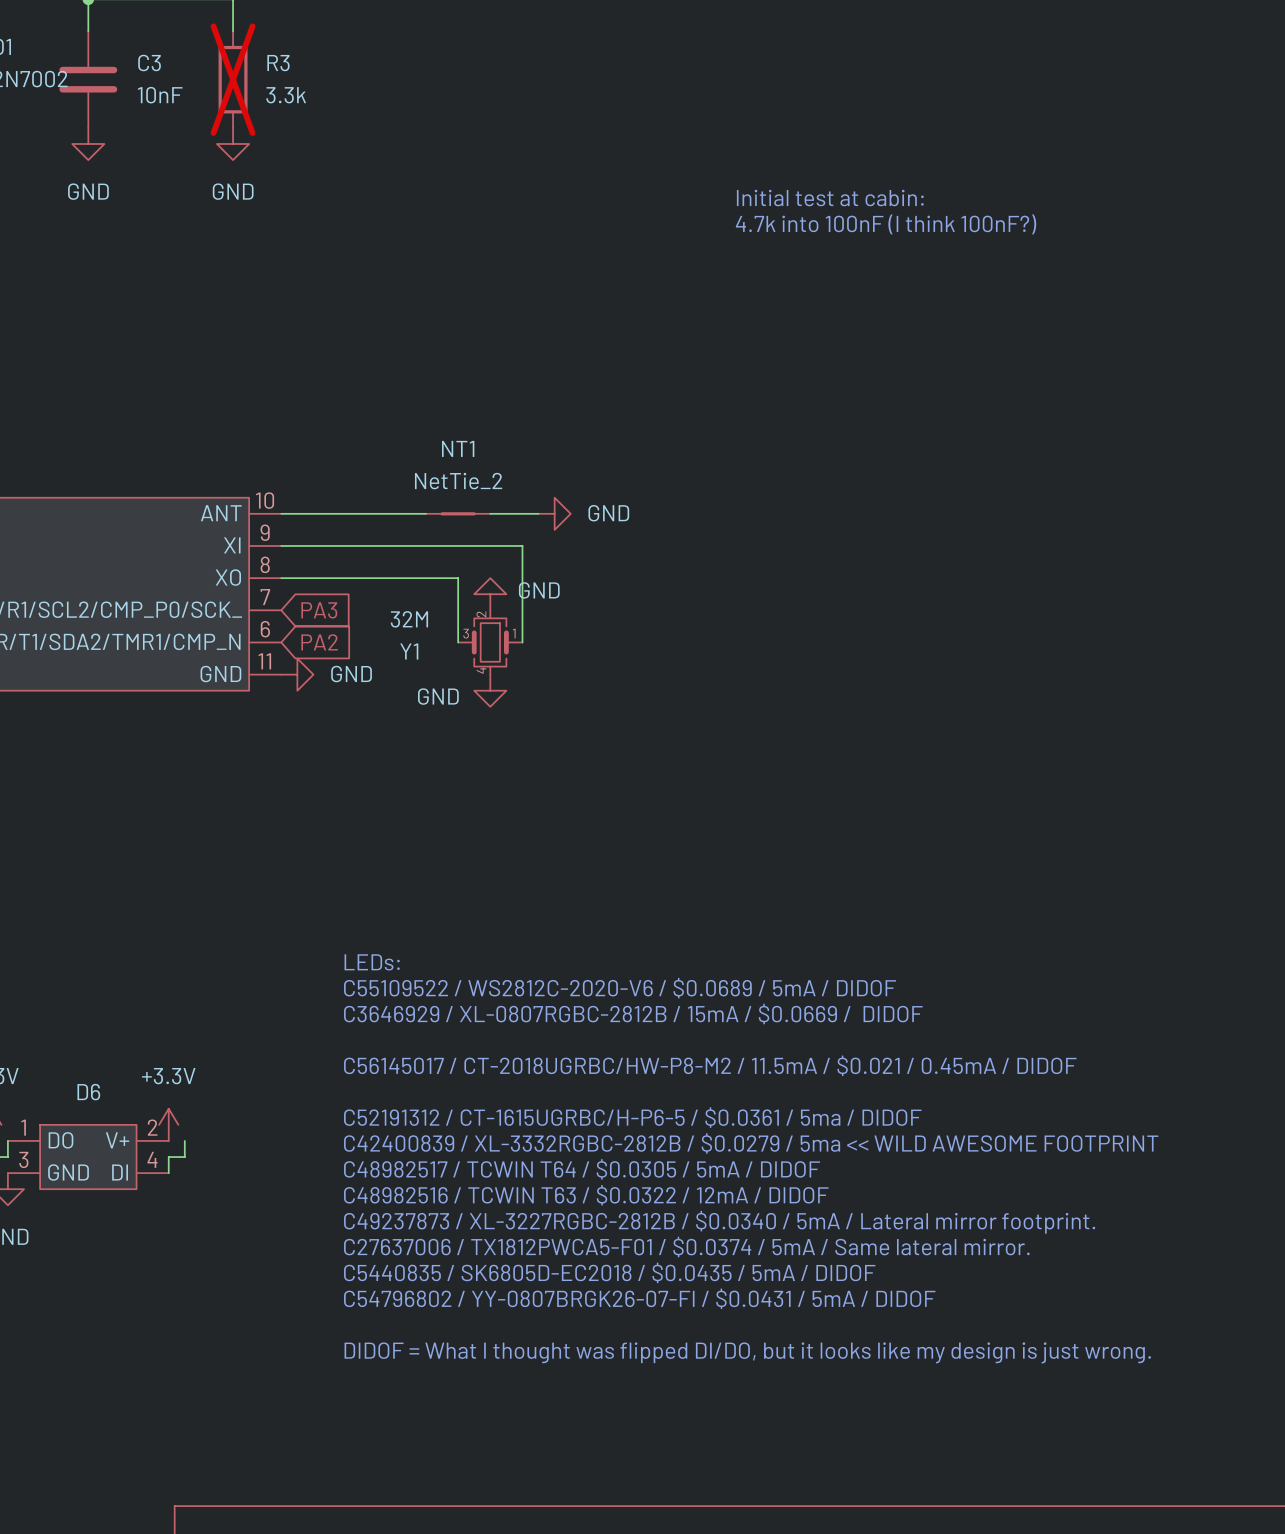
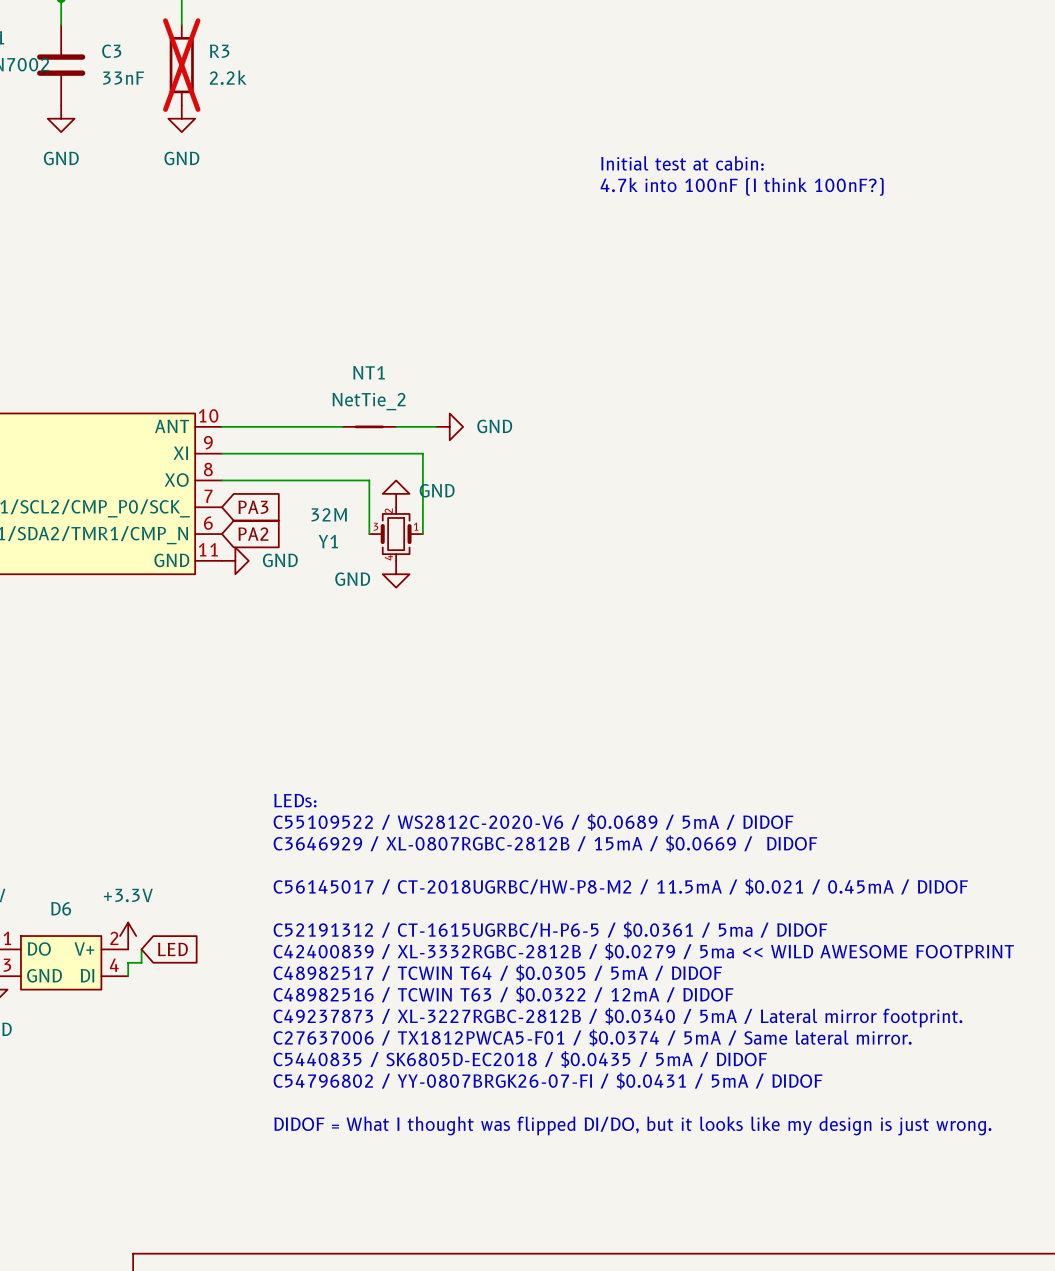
C3 value: 10nF (160, 95) -> 33nF (123, 78)
R3 value: 3.3k (286, 95) -> 2.2k (228, 77)
global label: none -> LED (172, 949)

